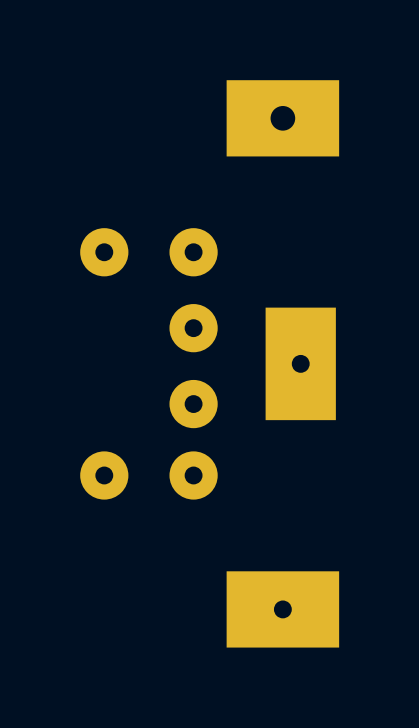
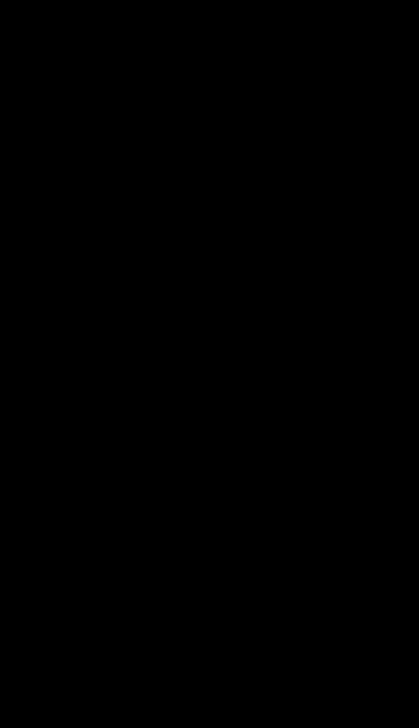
part: (209, 363) -> none

